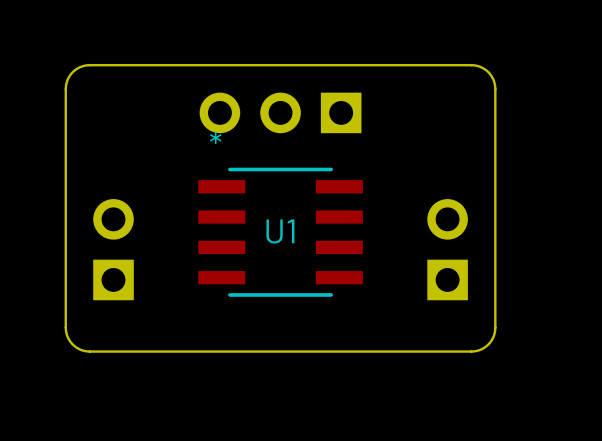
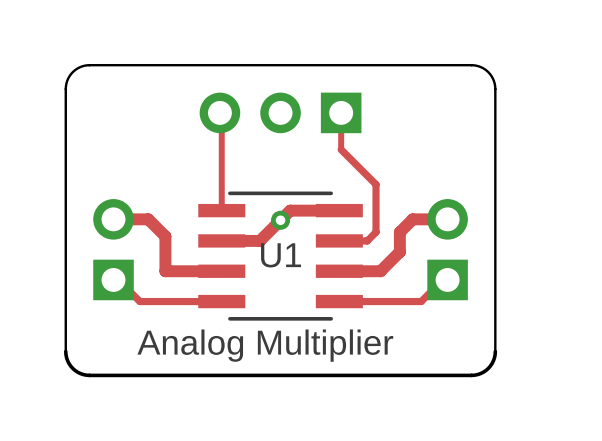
track: none -> (219, 115) (221, 117) (221, 210) (211, 210)
track: none -> (341, 115) (341, 149) (376, 184) (376, 232) (367, 240) (339, 240)
U1 text: * (215, 137) -> none
track: none -> (339, 210) (290, 210) (259, 240) (221, 240)
track: none -> (118, 219) (148, 219) (165, 236) (165, 271) (221, 271)
track: none -> (442, 219) (412, 219) (399, 232) (399, 251) (380, 271) (339, 271)
via: none -> (280, 220)
U1 position: (280, 232) -> (280, 256)
track: none -> (118, 279) (139, 301) (221, 301)
track: none -> (442, 279) (421, 301) (339, 301)
board edge: (65, 327) (68, 338) (72, 344) (79, 349) (89, 351) (474, 351) (488, 344) (492, 338) (495, 327) -> (65, 327) (65, 354) (68, 363) (77, 372) (89, 375) (474, 375) (485, 370) (493, 360) (495, 327)
text: none -> Analog Multiplier (265, 345)

